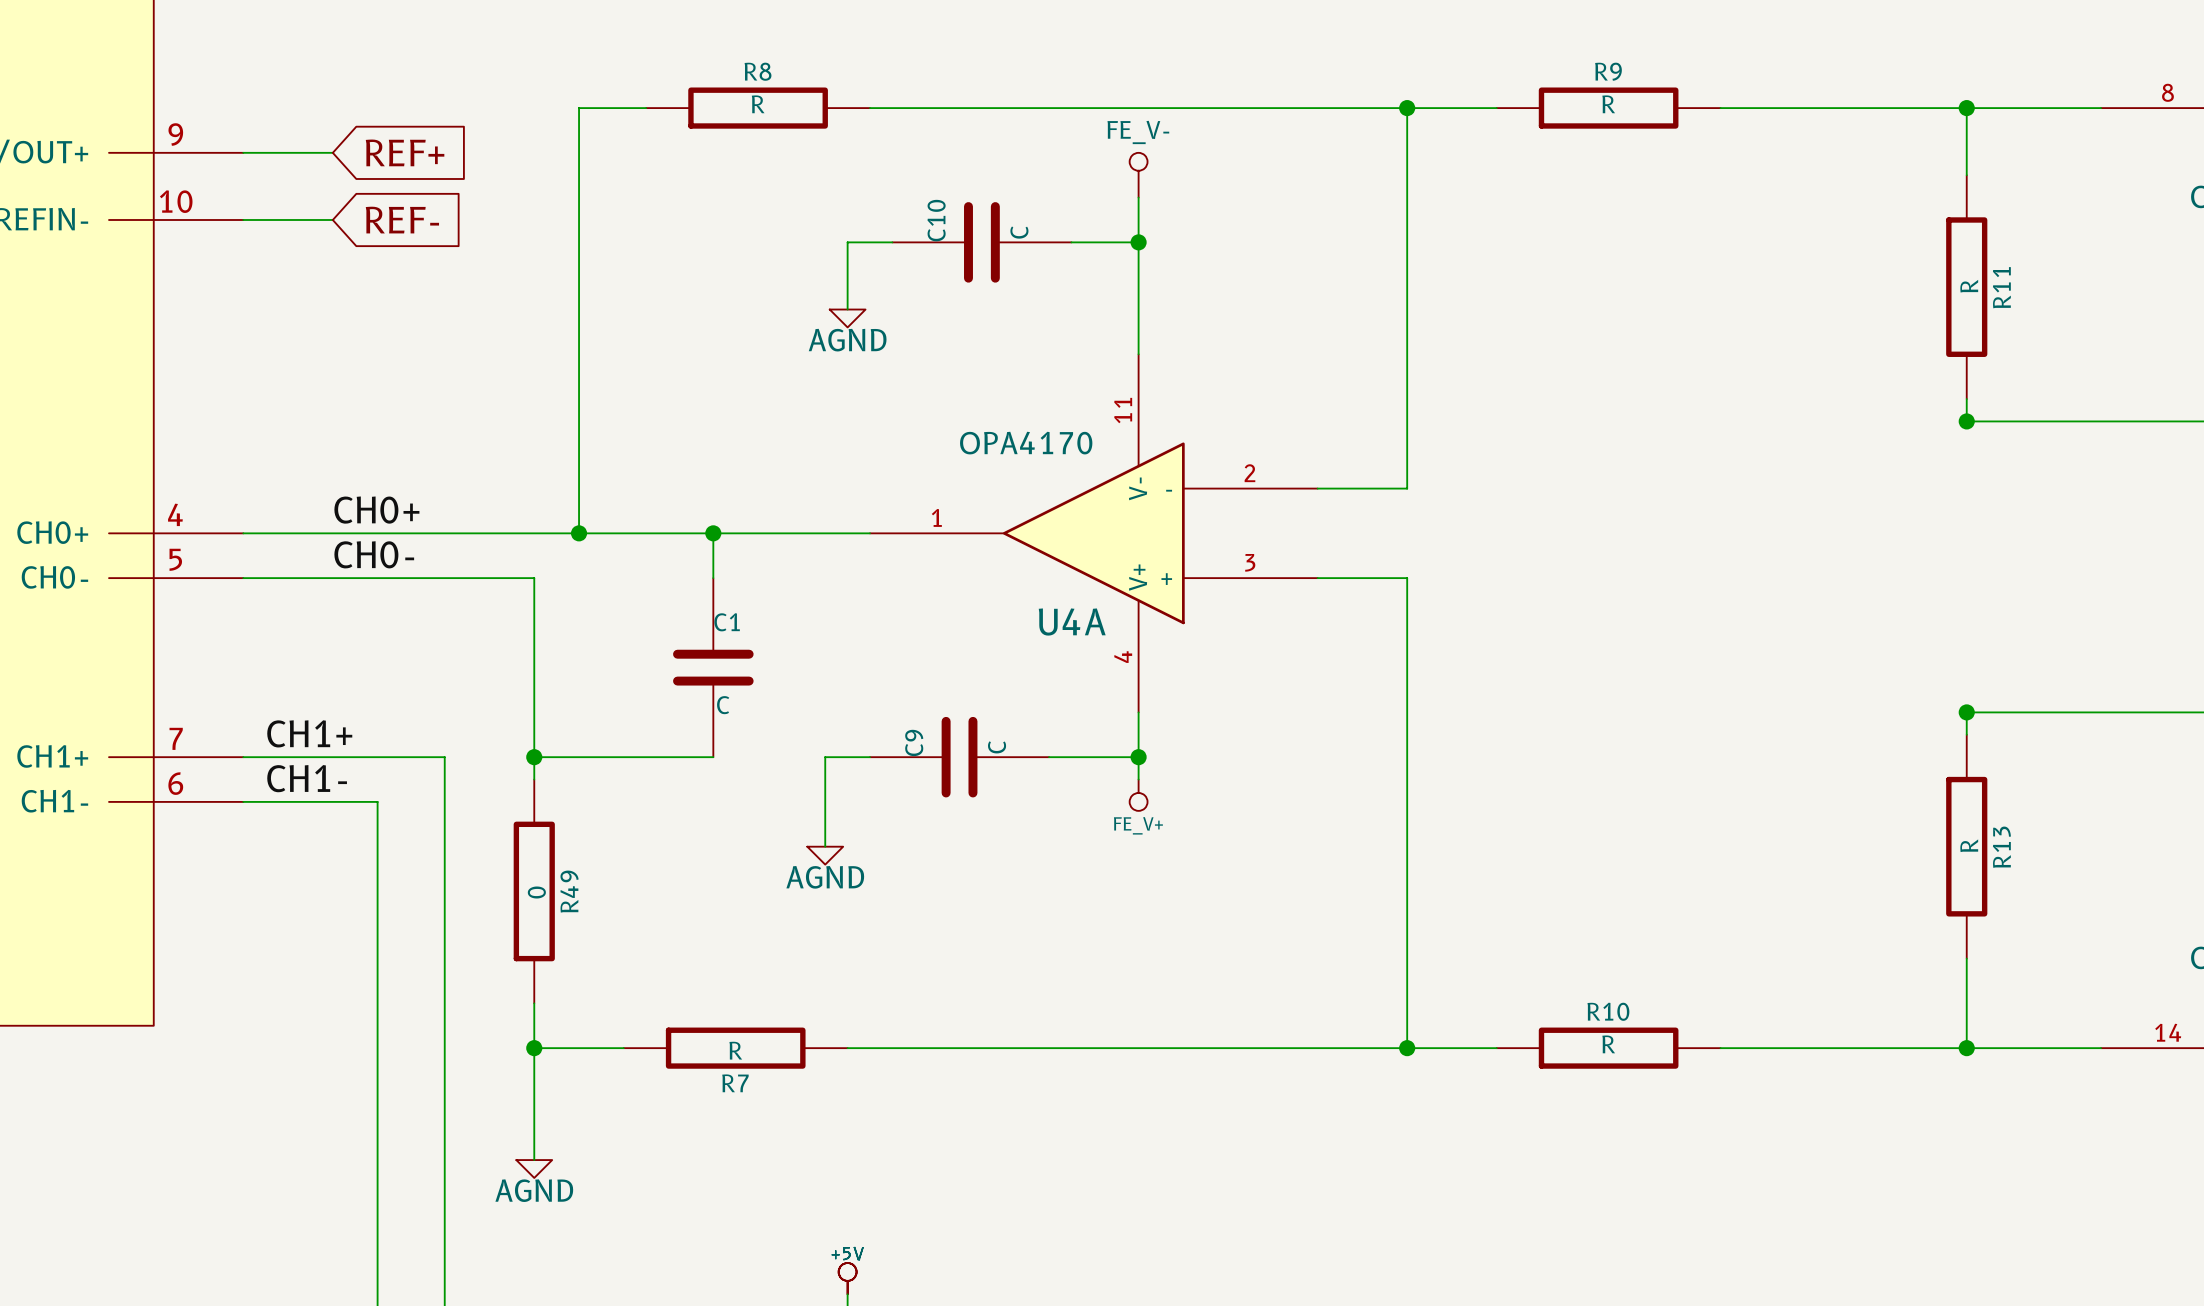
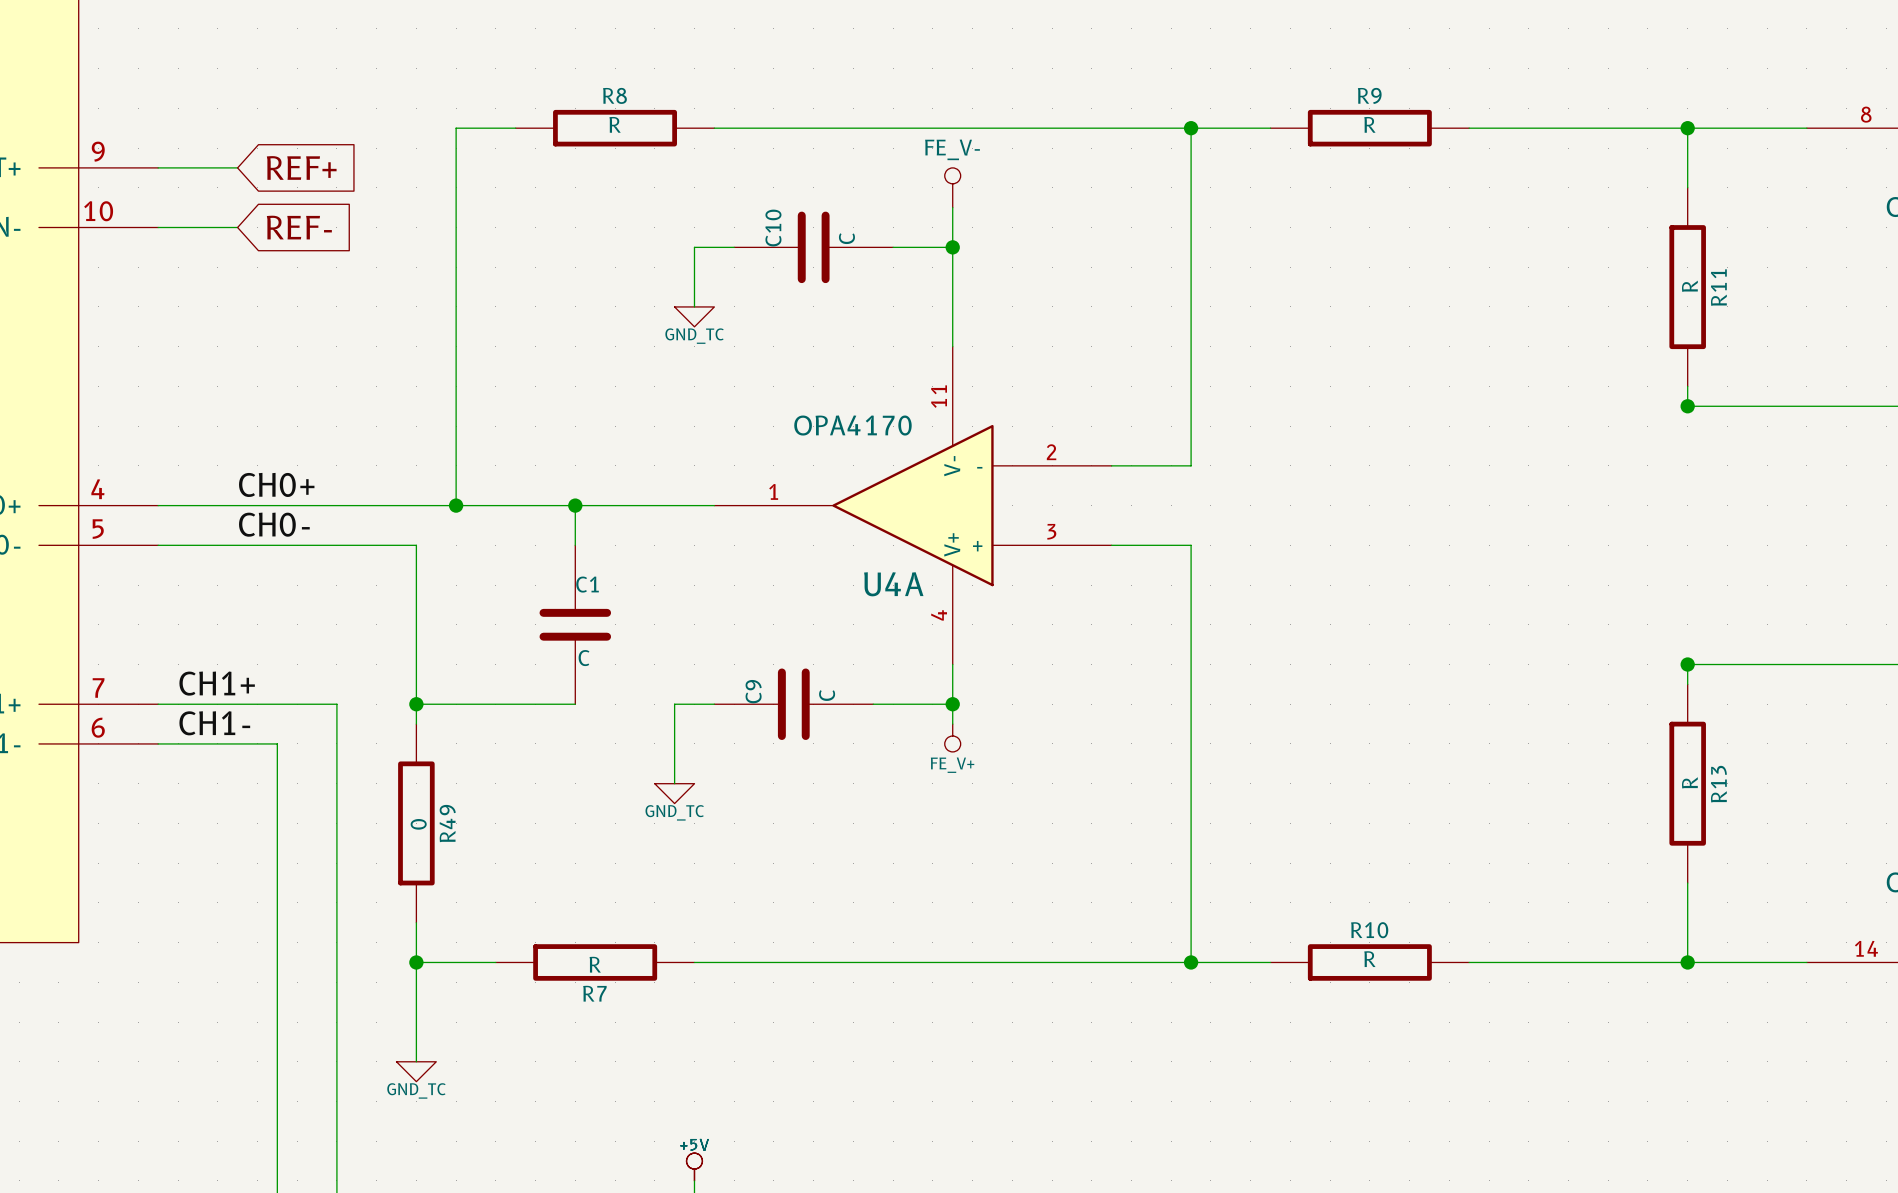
power symbol: AGND (847, 318) -> GND_TC (694, 316)
power symbol: AGND (825, 855) -> GND_TC (674, 793)
power symbol: AGND (534, 1169) -> GND_TC (416, 1071)

